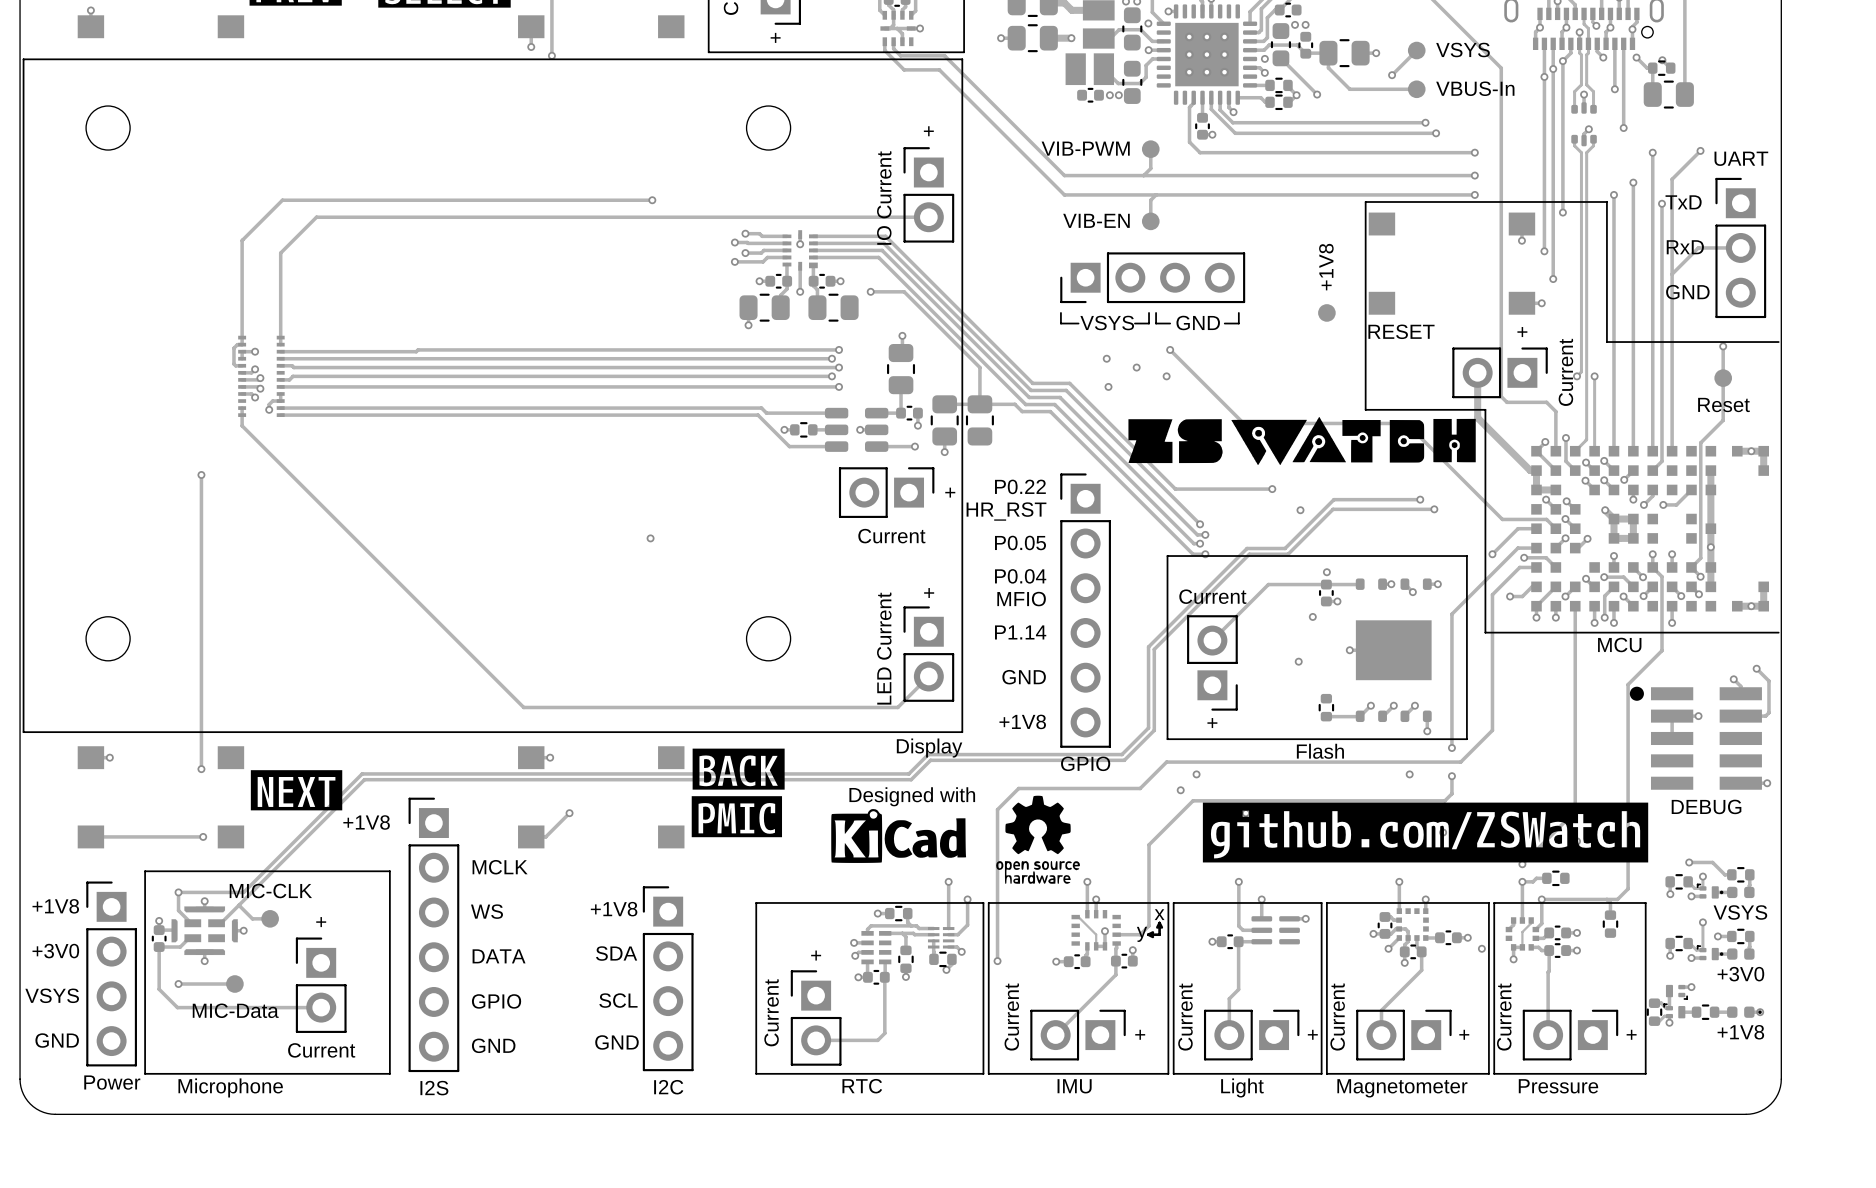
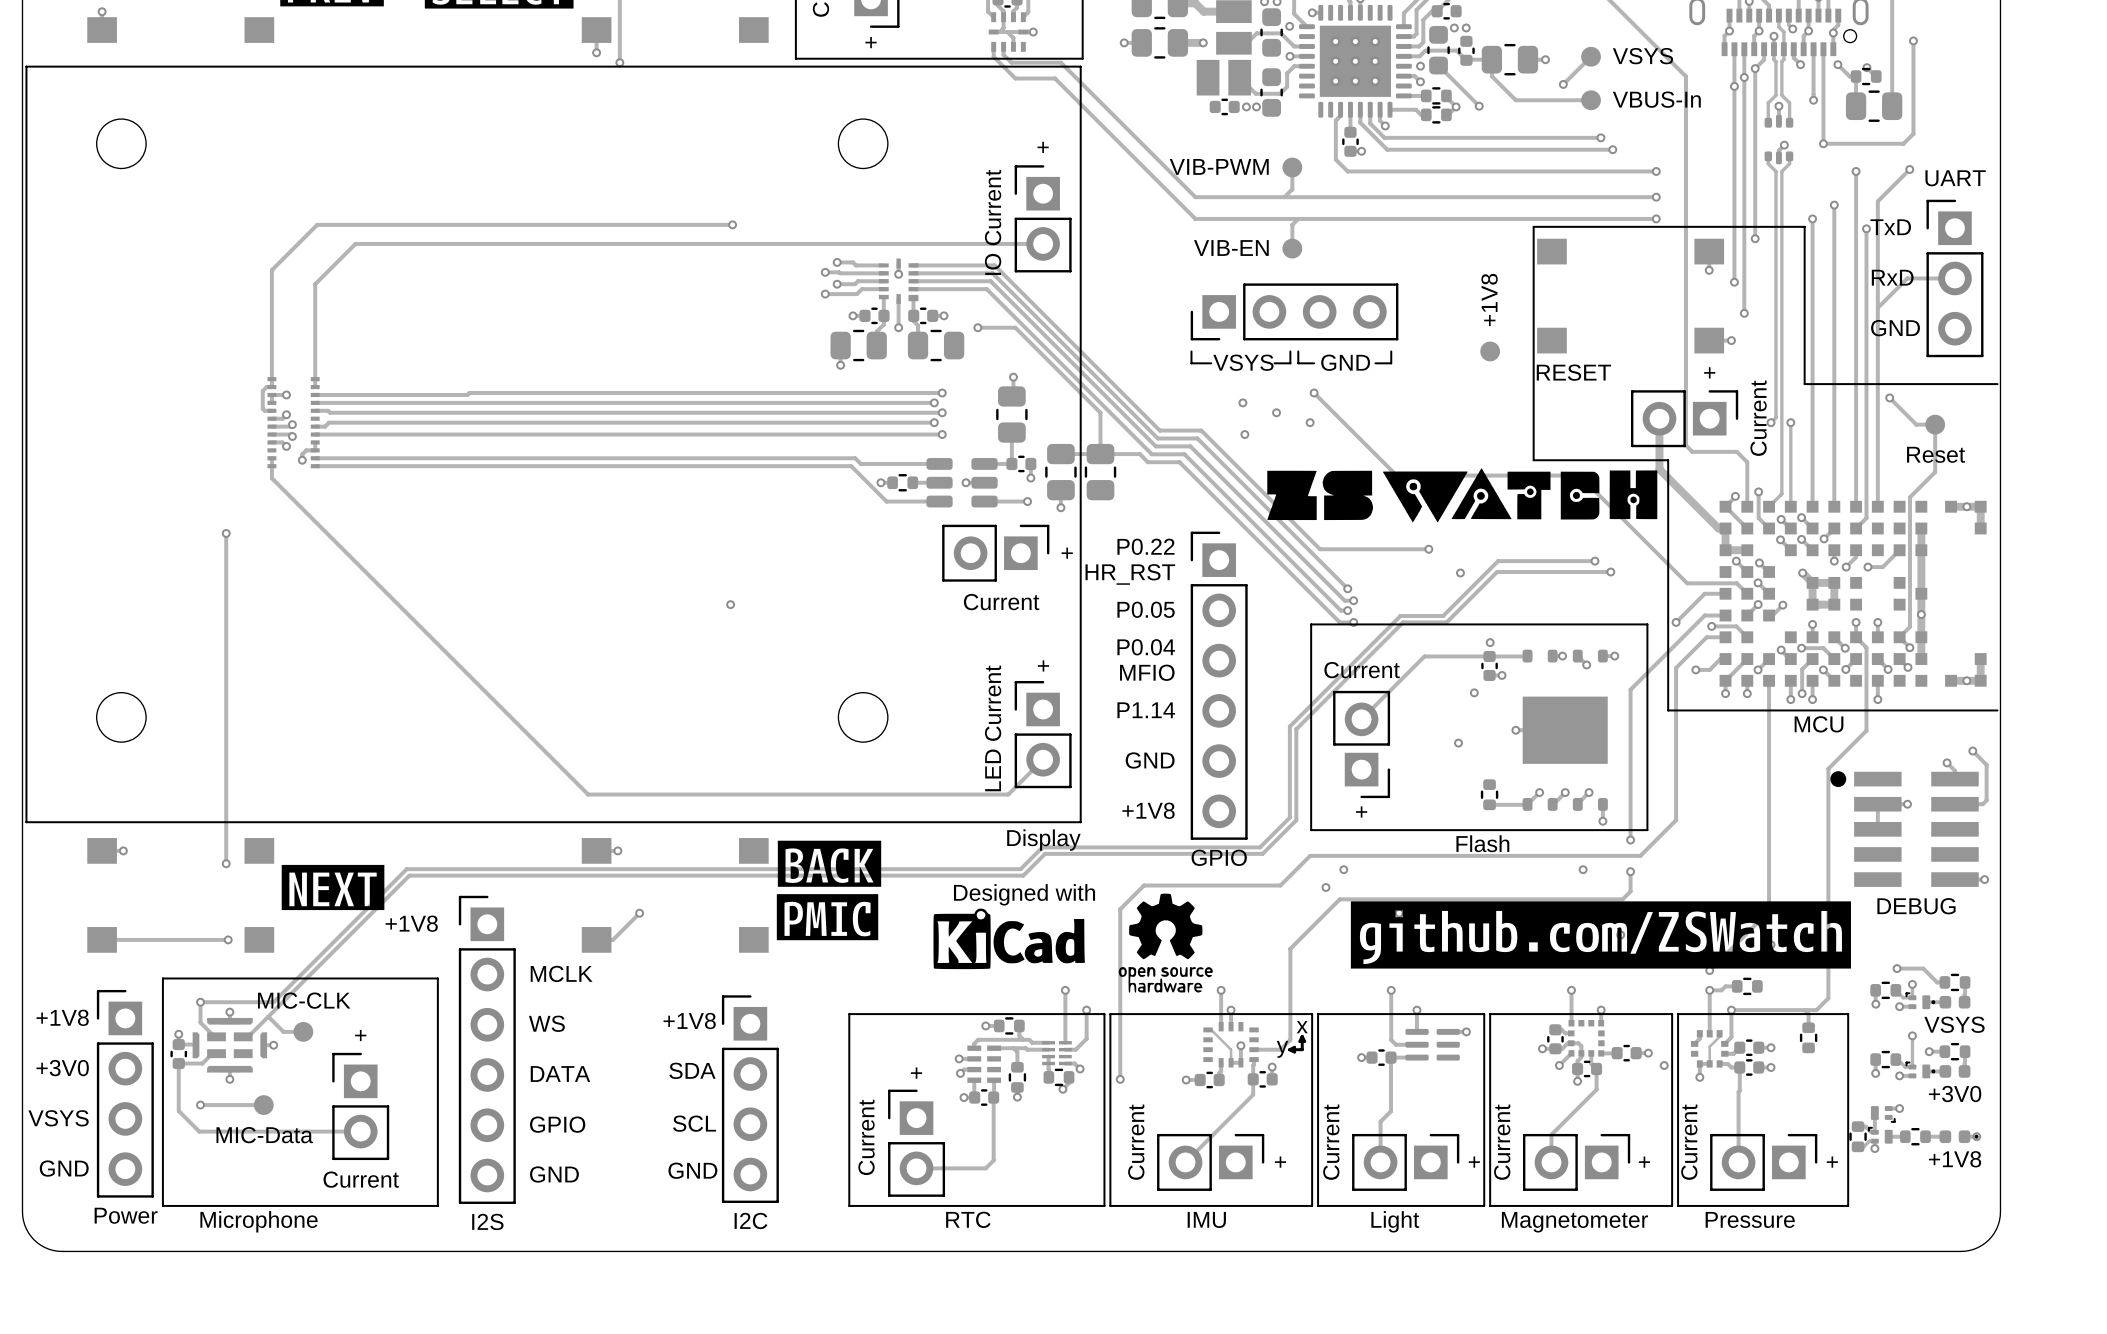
track: none -> (1913, 40) (1913, 133) (1903, 143) (1823, 143)
via: none -> (1913, 40)
track: (1723, 346) (1723, 378) -> (1889, 397) (1916, 424) (1935, 424)
via position: (1723, 346) -> (1889, 397)

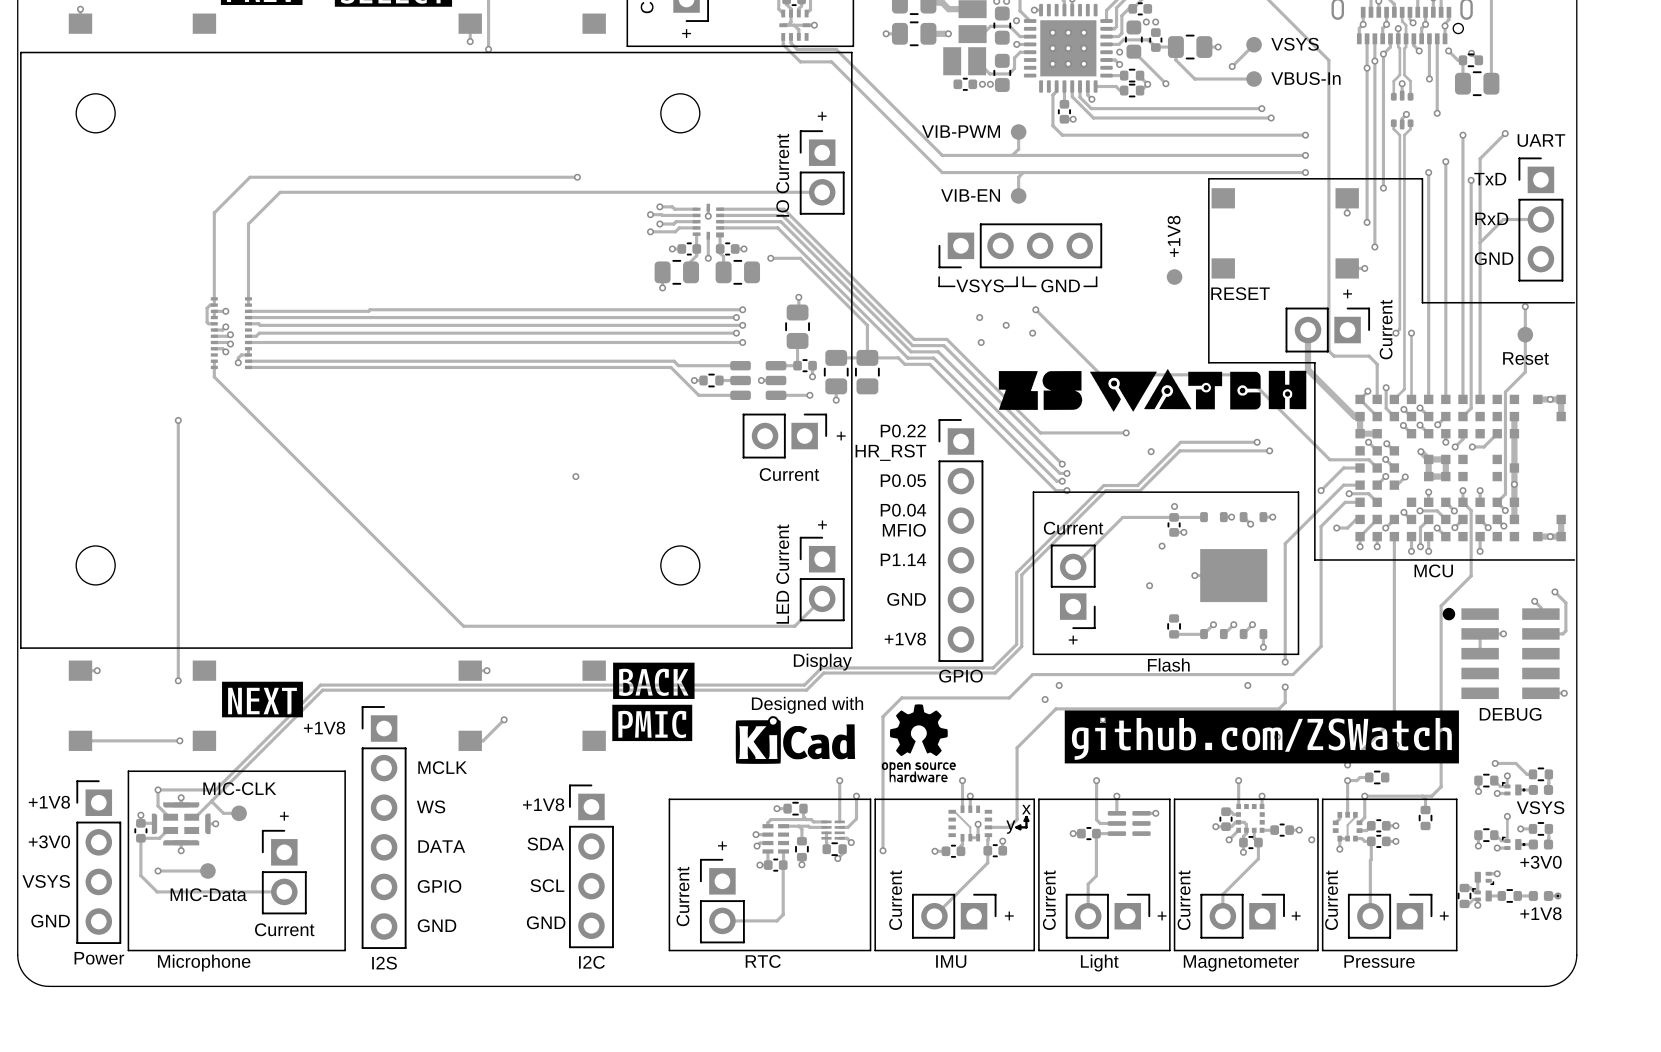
track: (1913, 40) (1913, 133) (1903, 143) (1823, 143) -> none
via: (1913, 40) -> none
track: (1889, 397) (1916, 424) (1935, 424) -> (1525, 306) (1525, 334)
via position: (1889, 397) -> (1525, 306)

